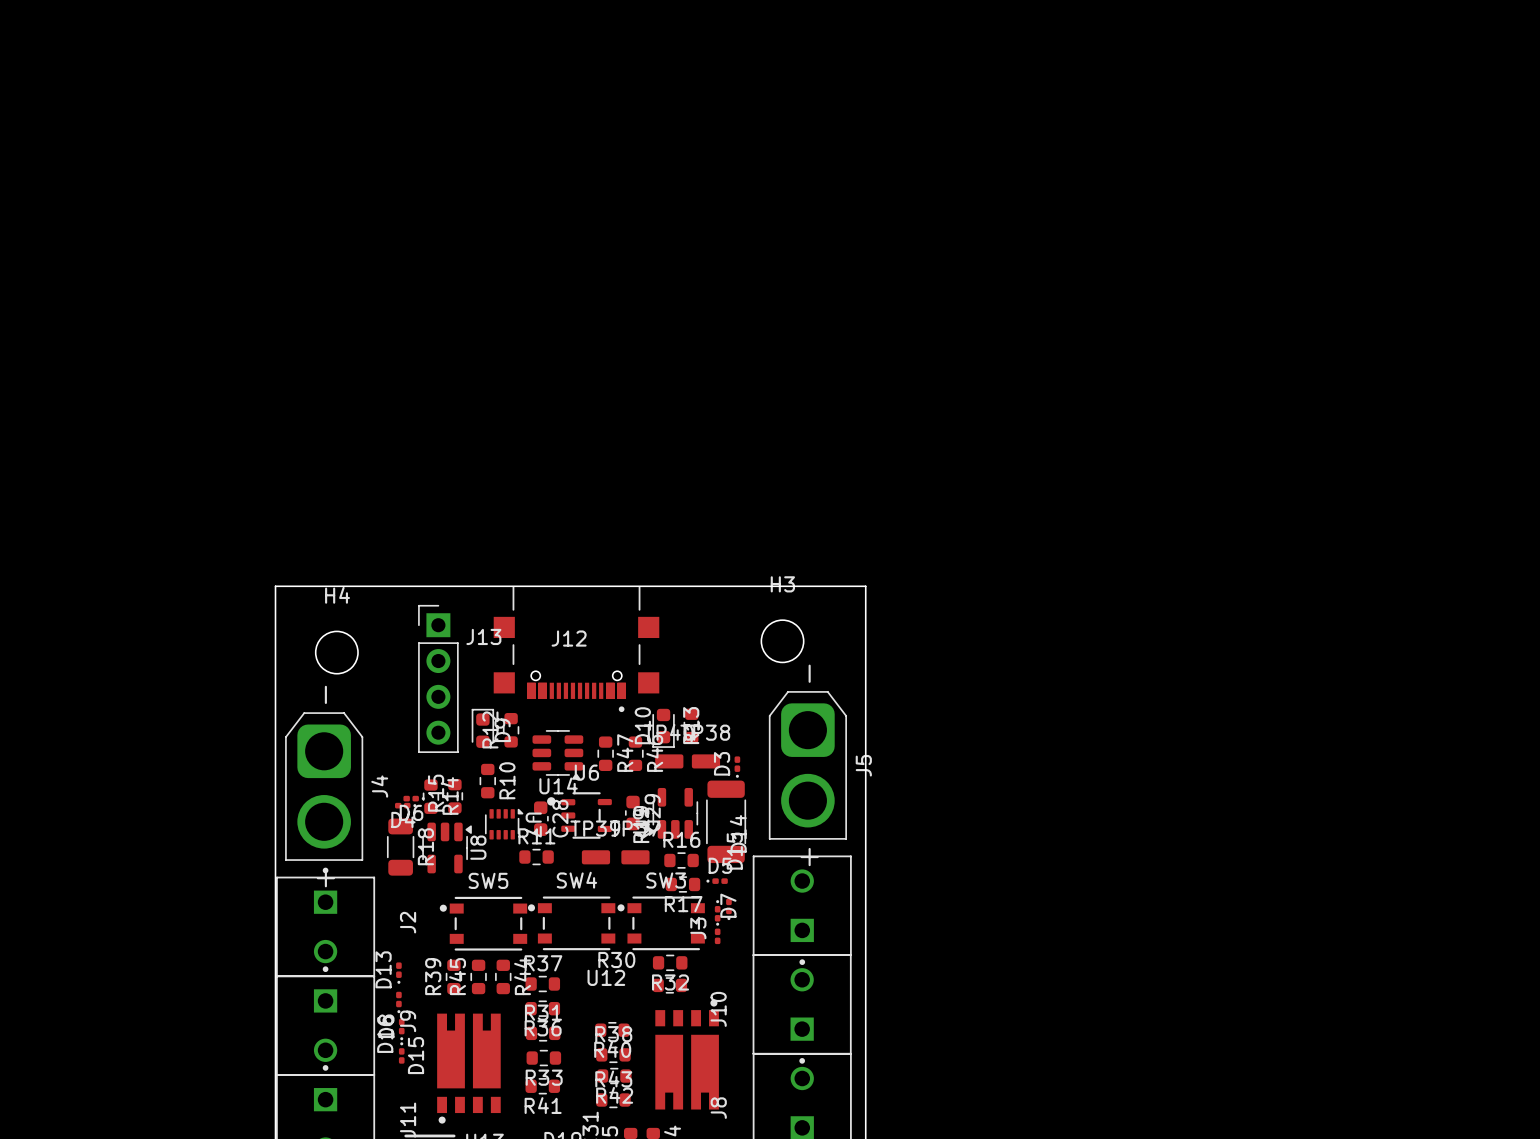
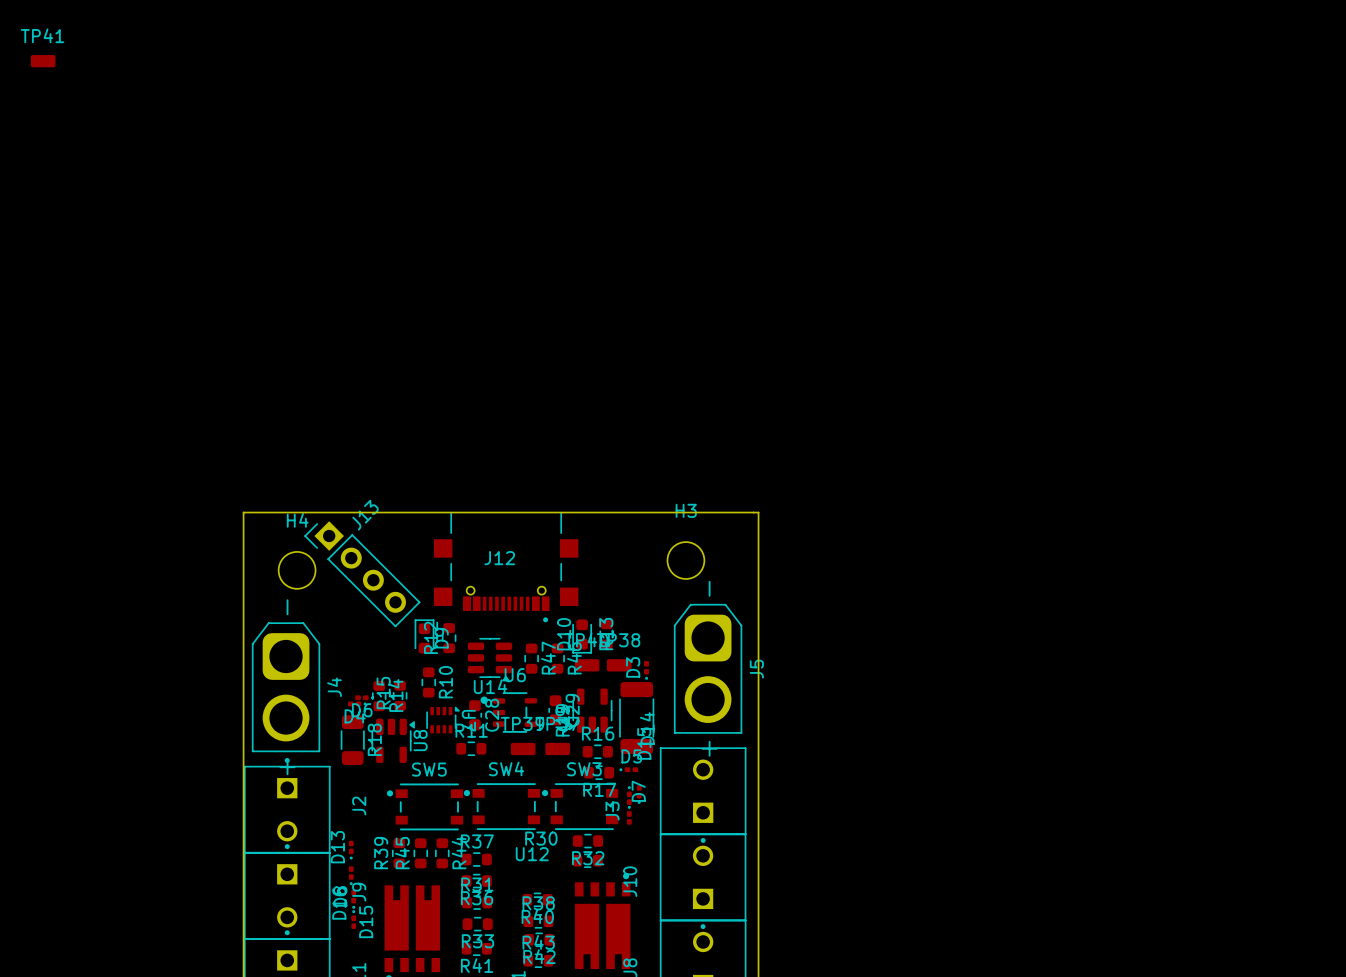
TP41: none -> (43, 61)
J13 rotation: 0° (438, 678) -> 45° counterclockwise (362, 574)

